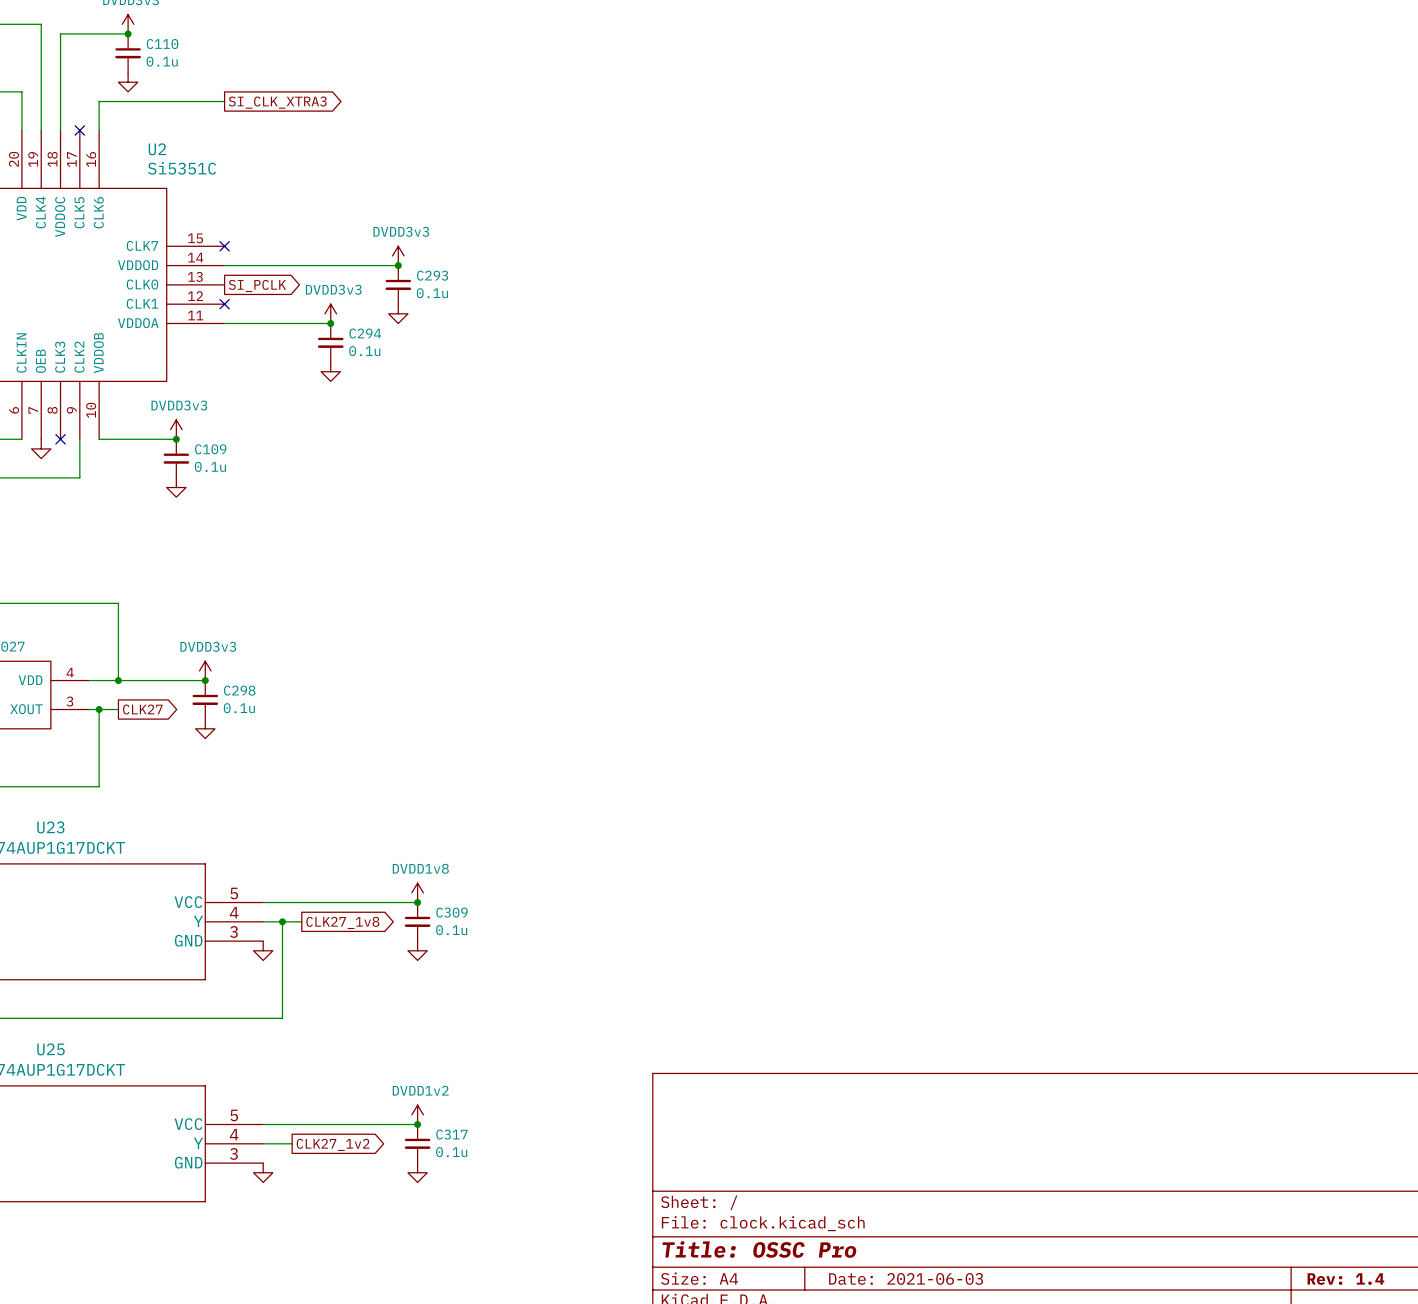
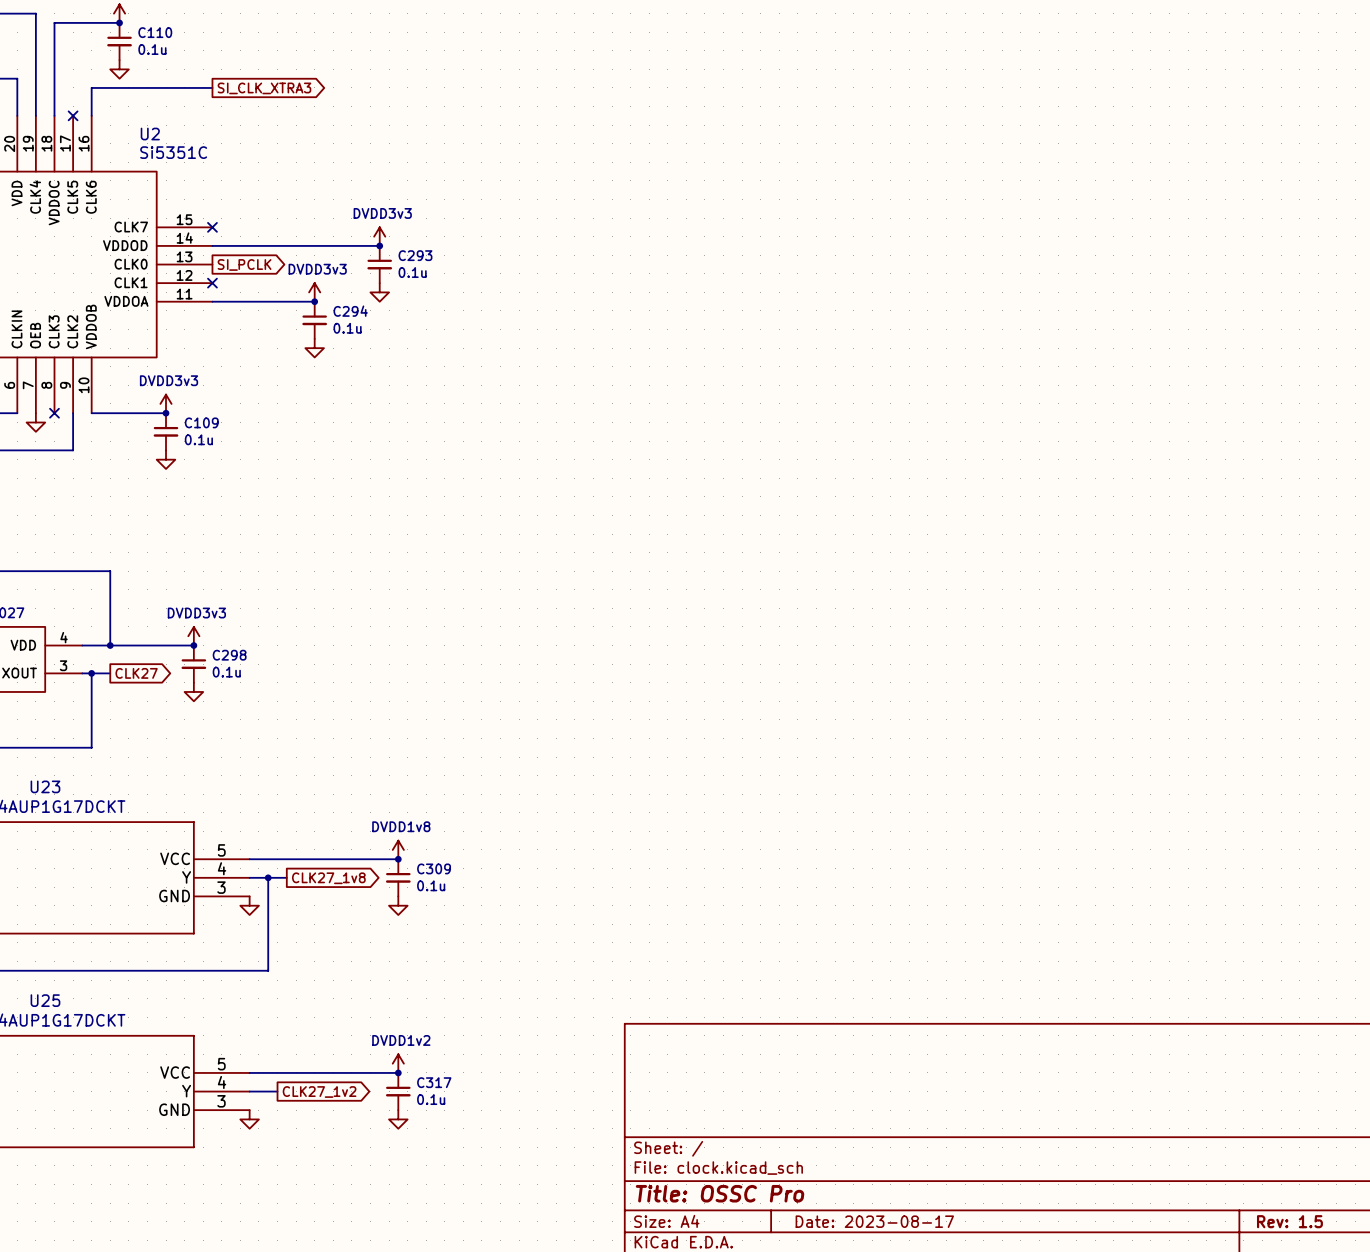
title block: Date: 2021-06-03 (906, 1278) -> Date: 2023-08-17 (874, 1221)
title block: Rev: 1.4 (1345, 1279) -> Rev: 1.5 (1289, 1221)

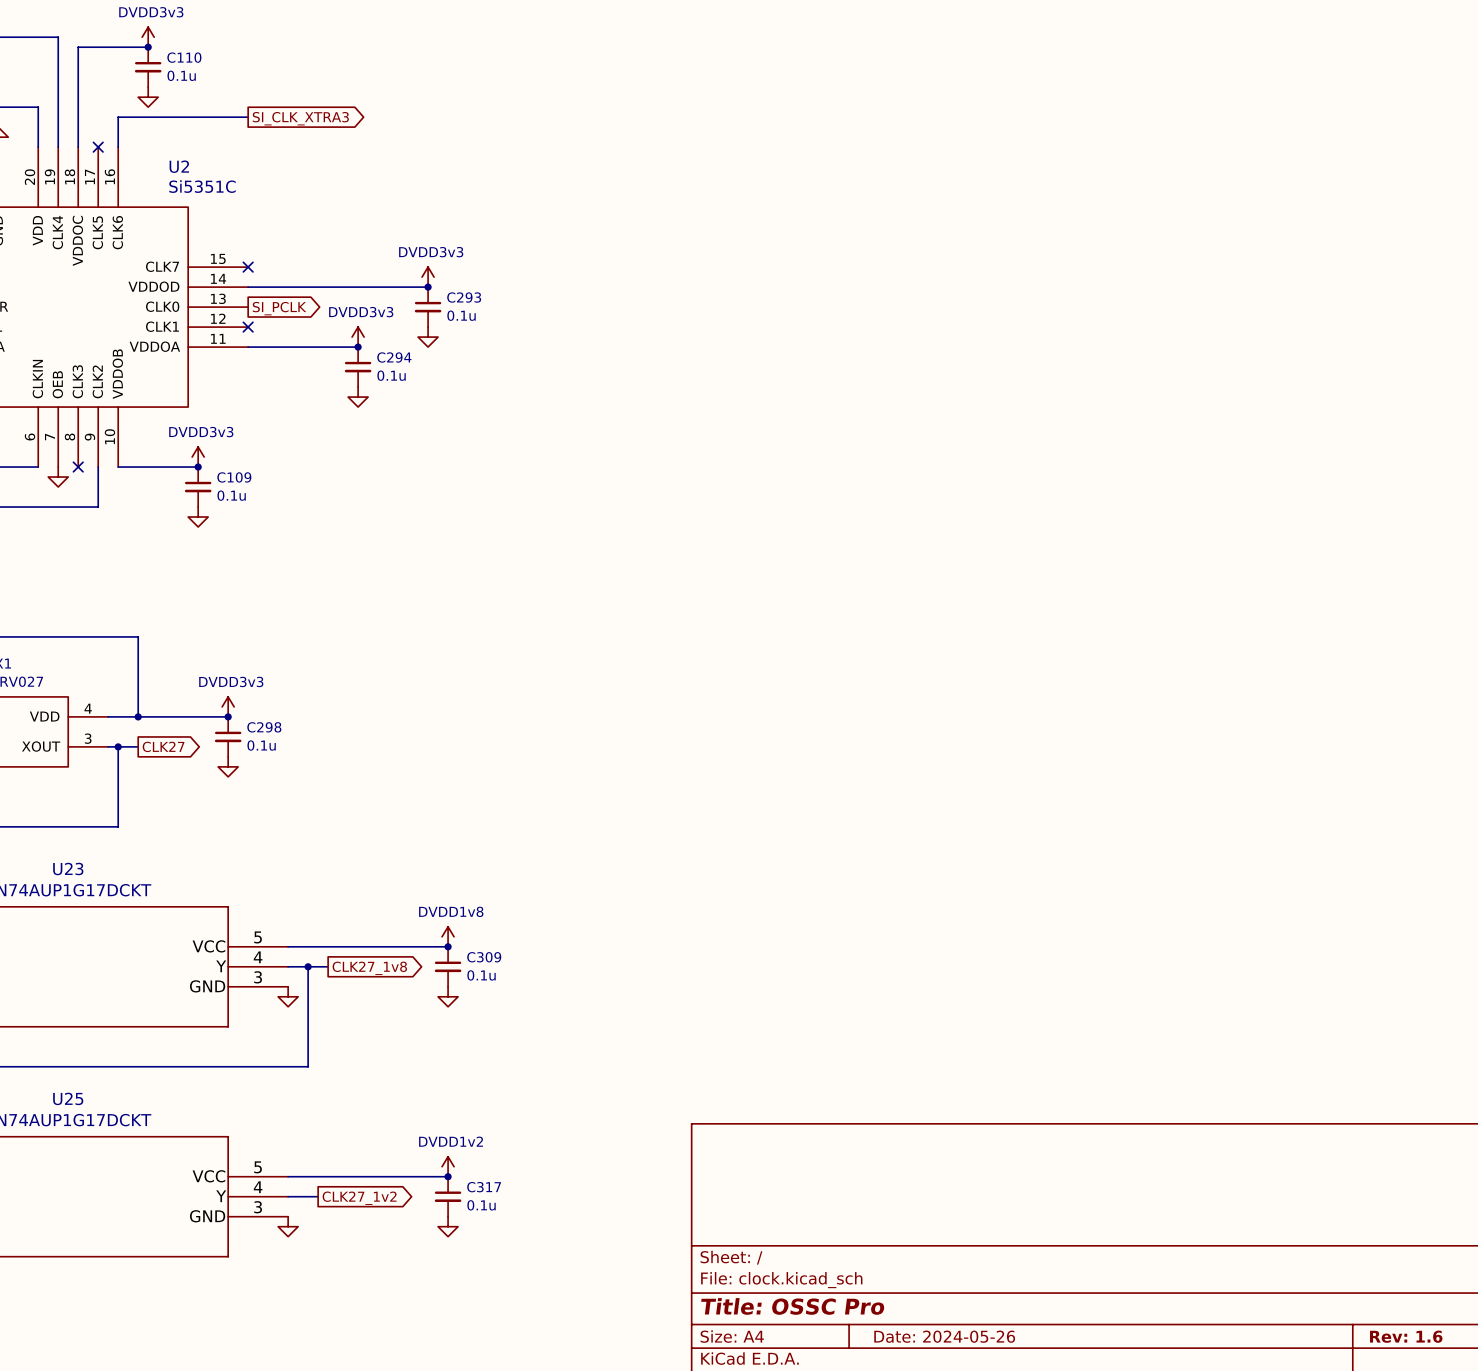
title block: Date: 2023-08-17 (874, 1221) -> Date: 2024-05-26 (944, 1336)
title block: Rev: 1.5 (1289, 1221) -> Rev: 1.6 (1406, 1336)

